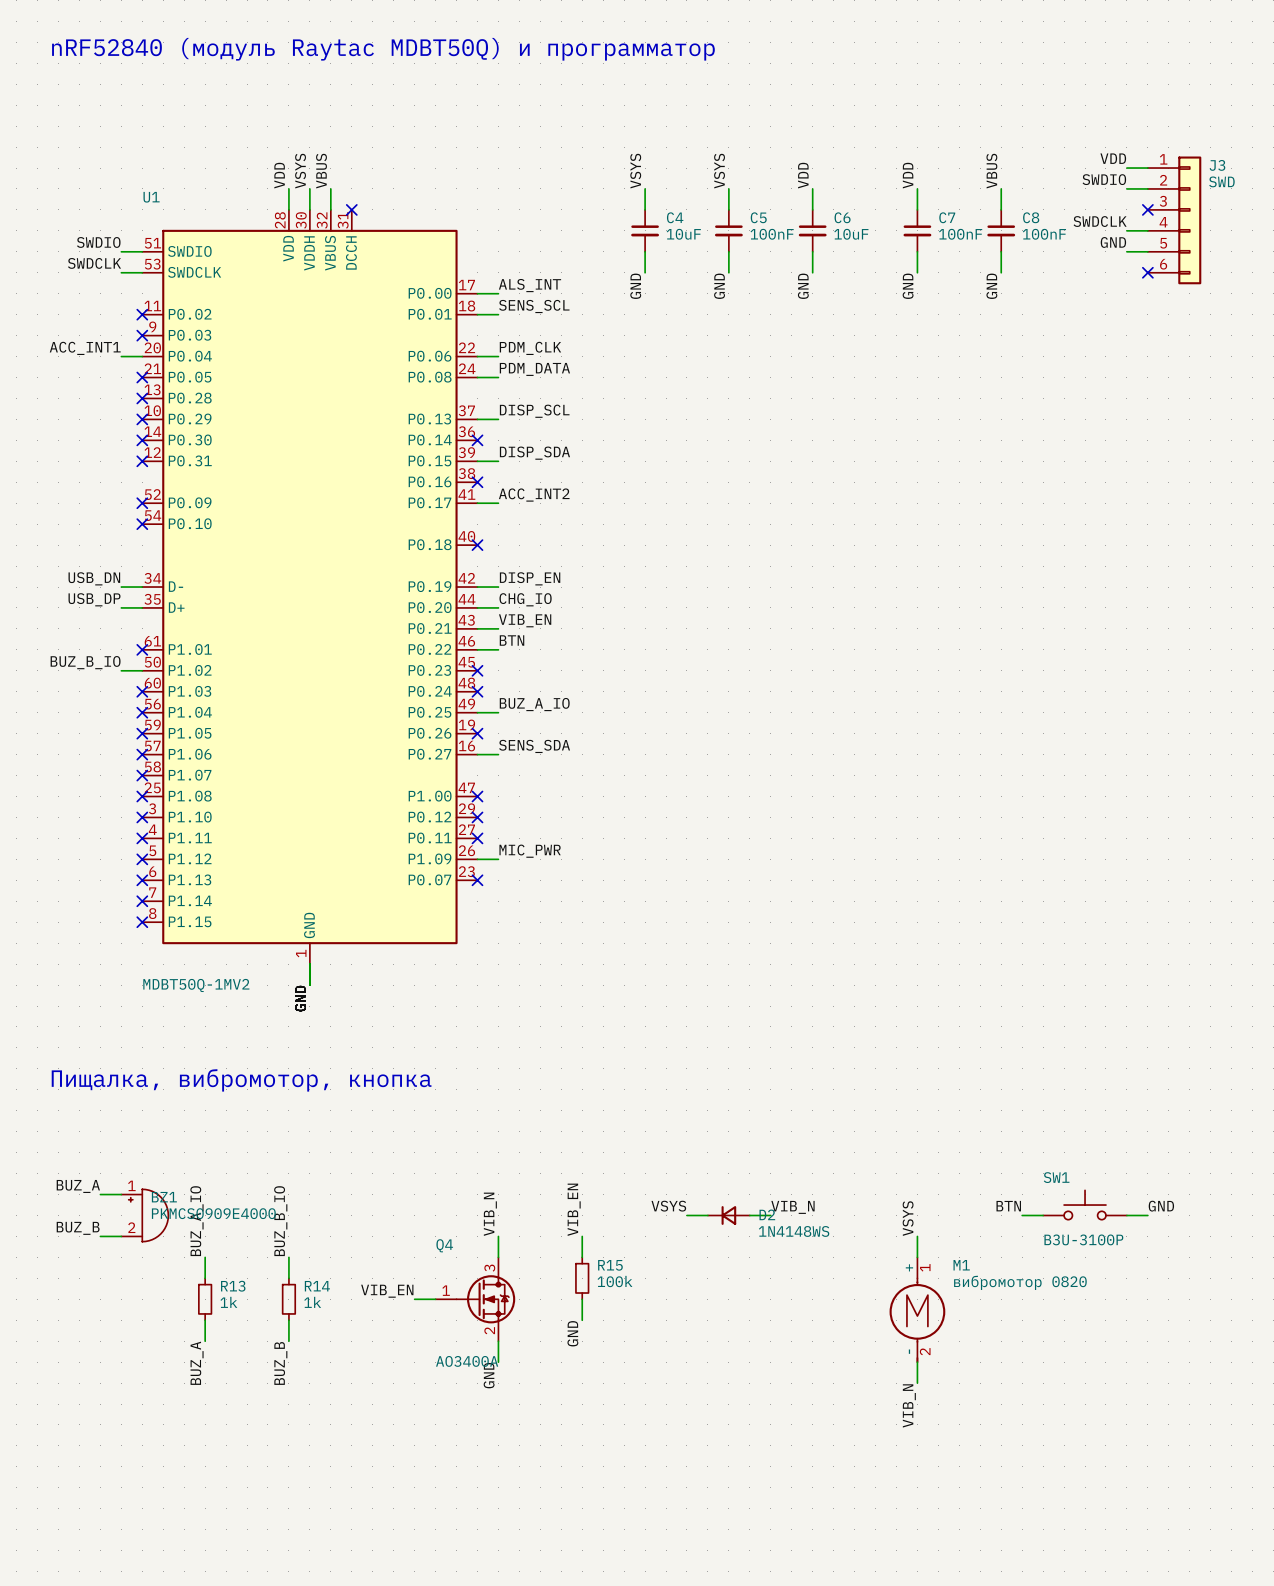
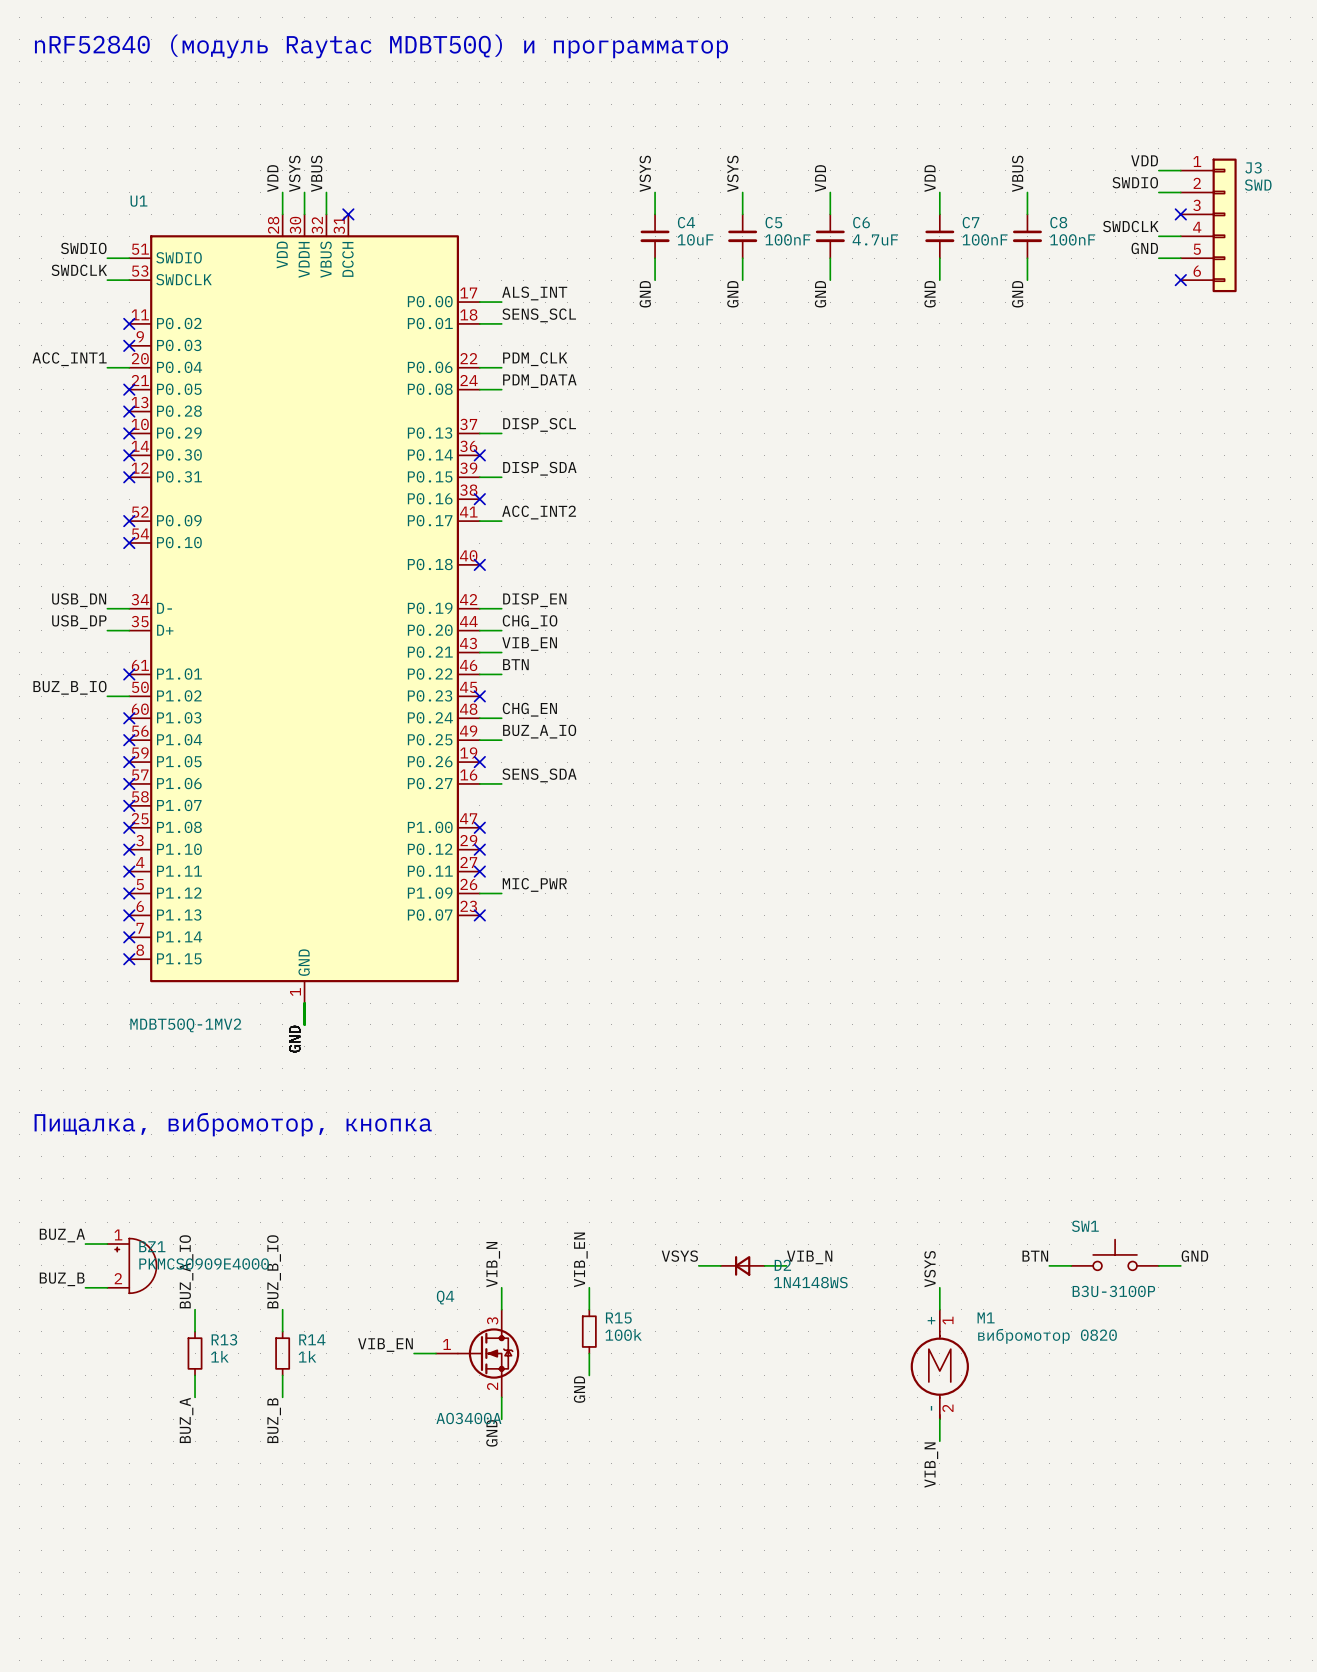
C6 value: 10uF (851, 234) -> 4.7uF (875, 239)
label: none -> CHG_EN (529, 709)
wire: none -> (479, 718) (501, 718)
no-connect mark: (477, 691) -> none

